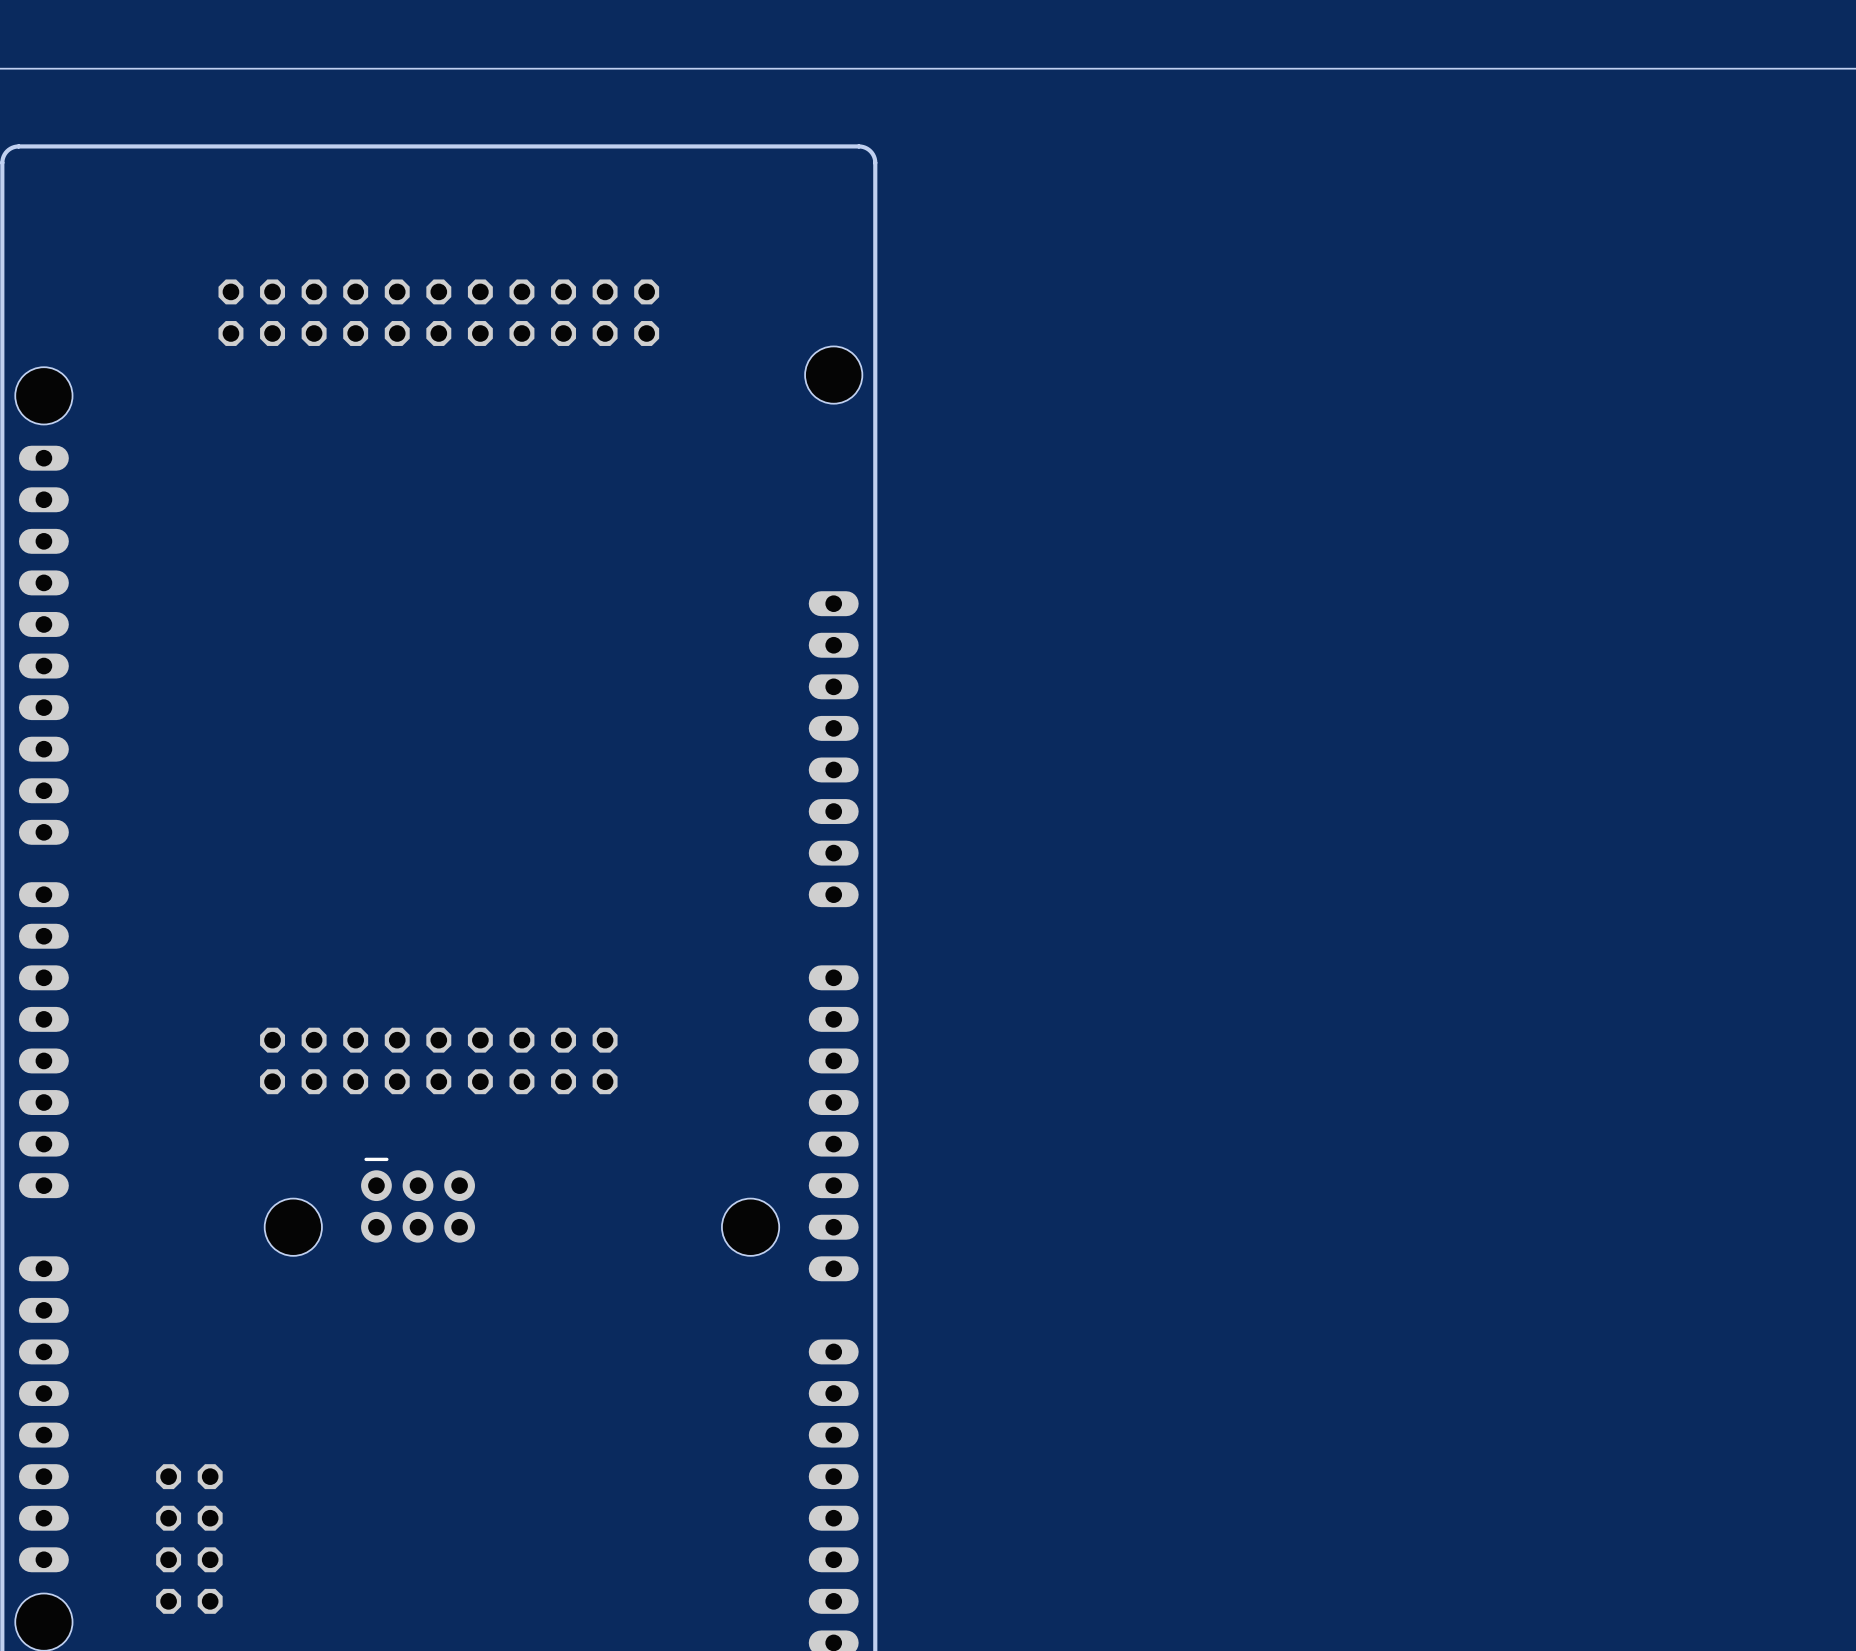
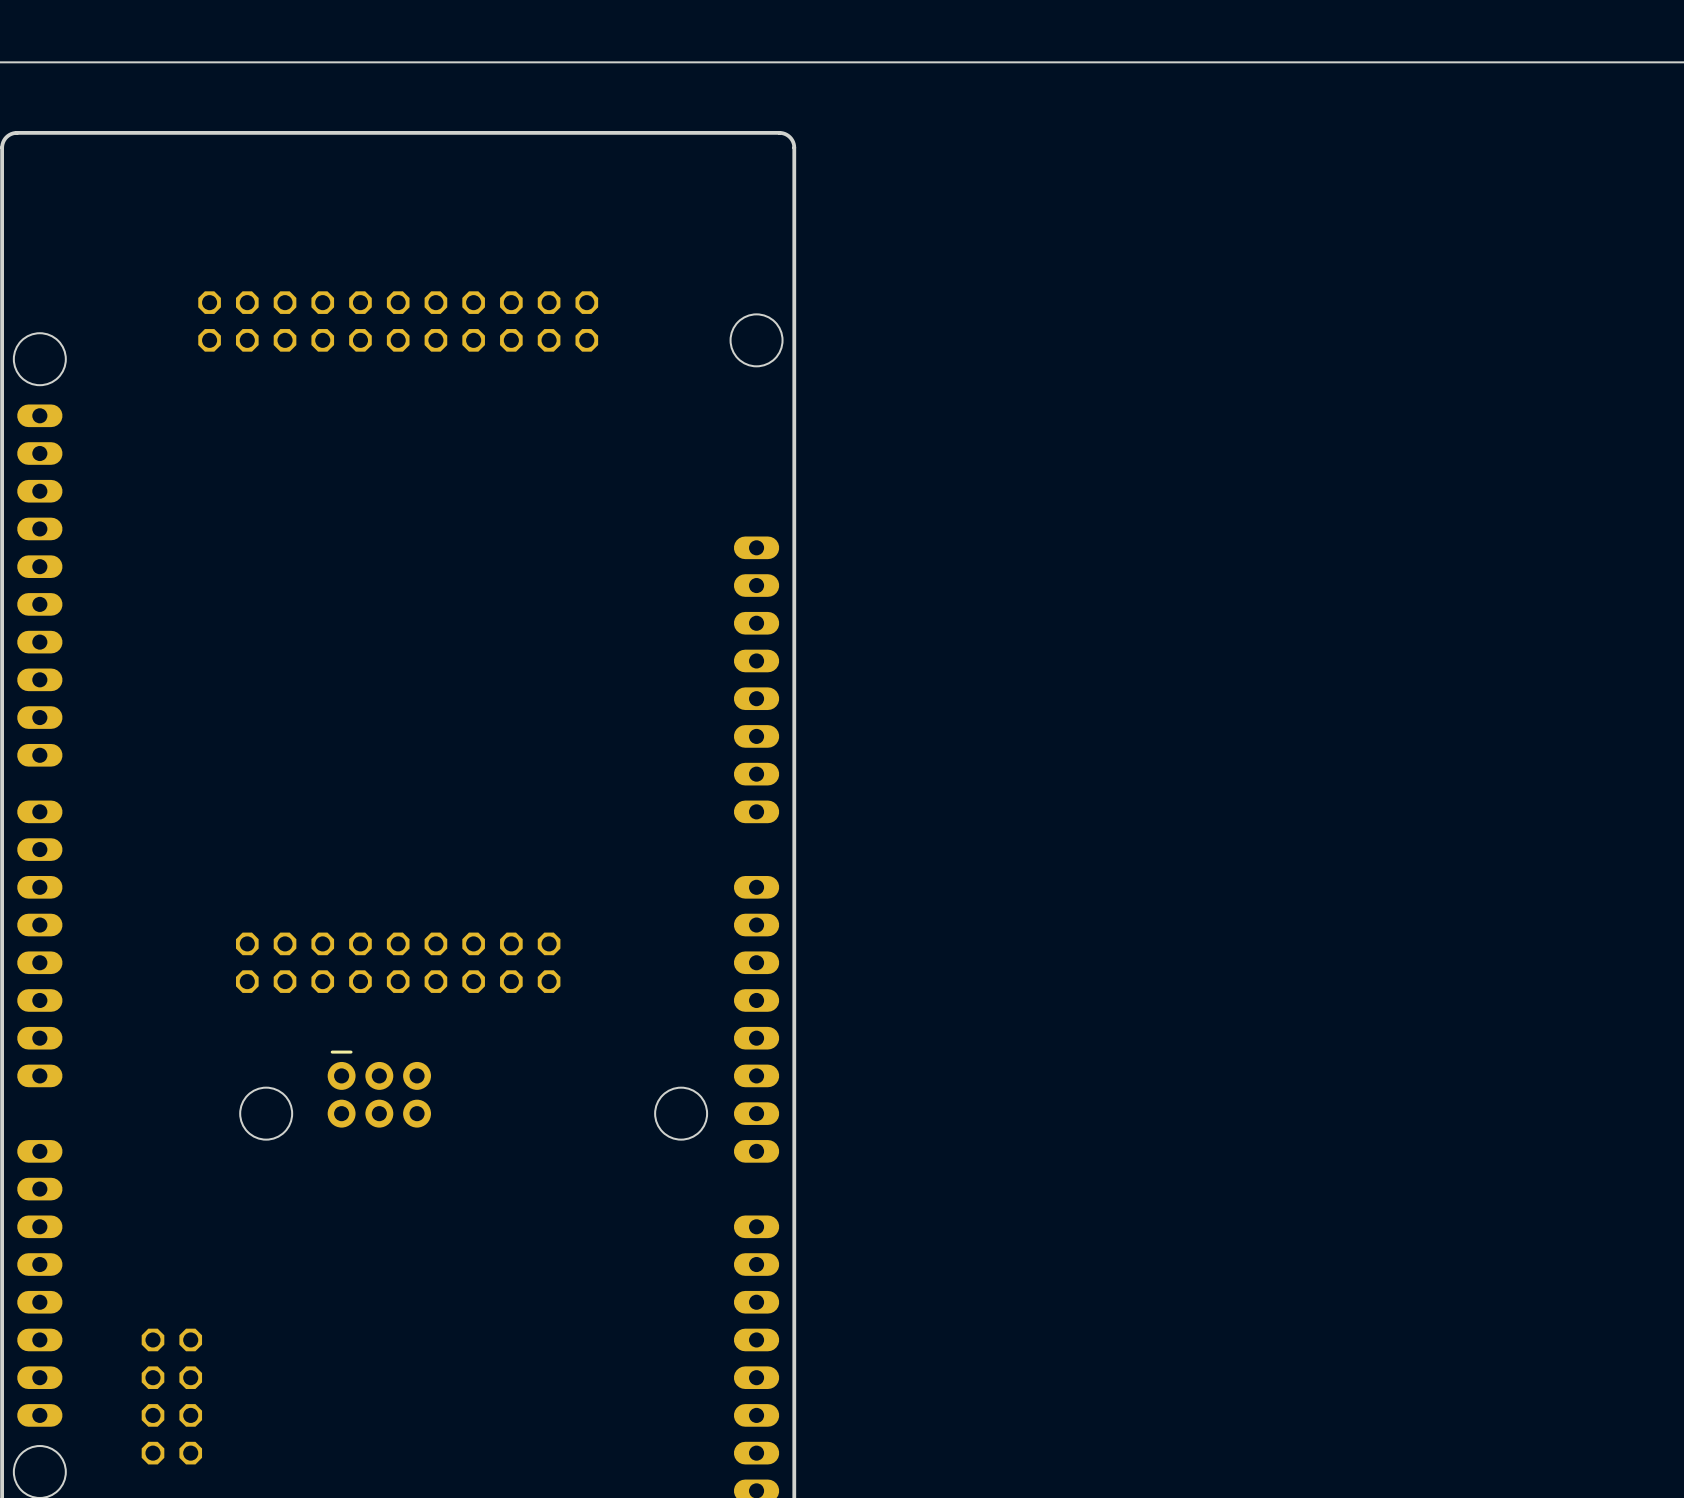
part position: (438, 312) -> (398, 321)

